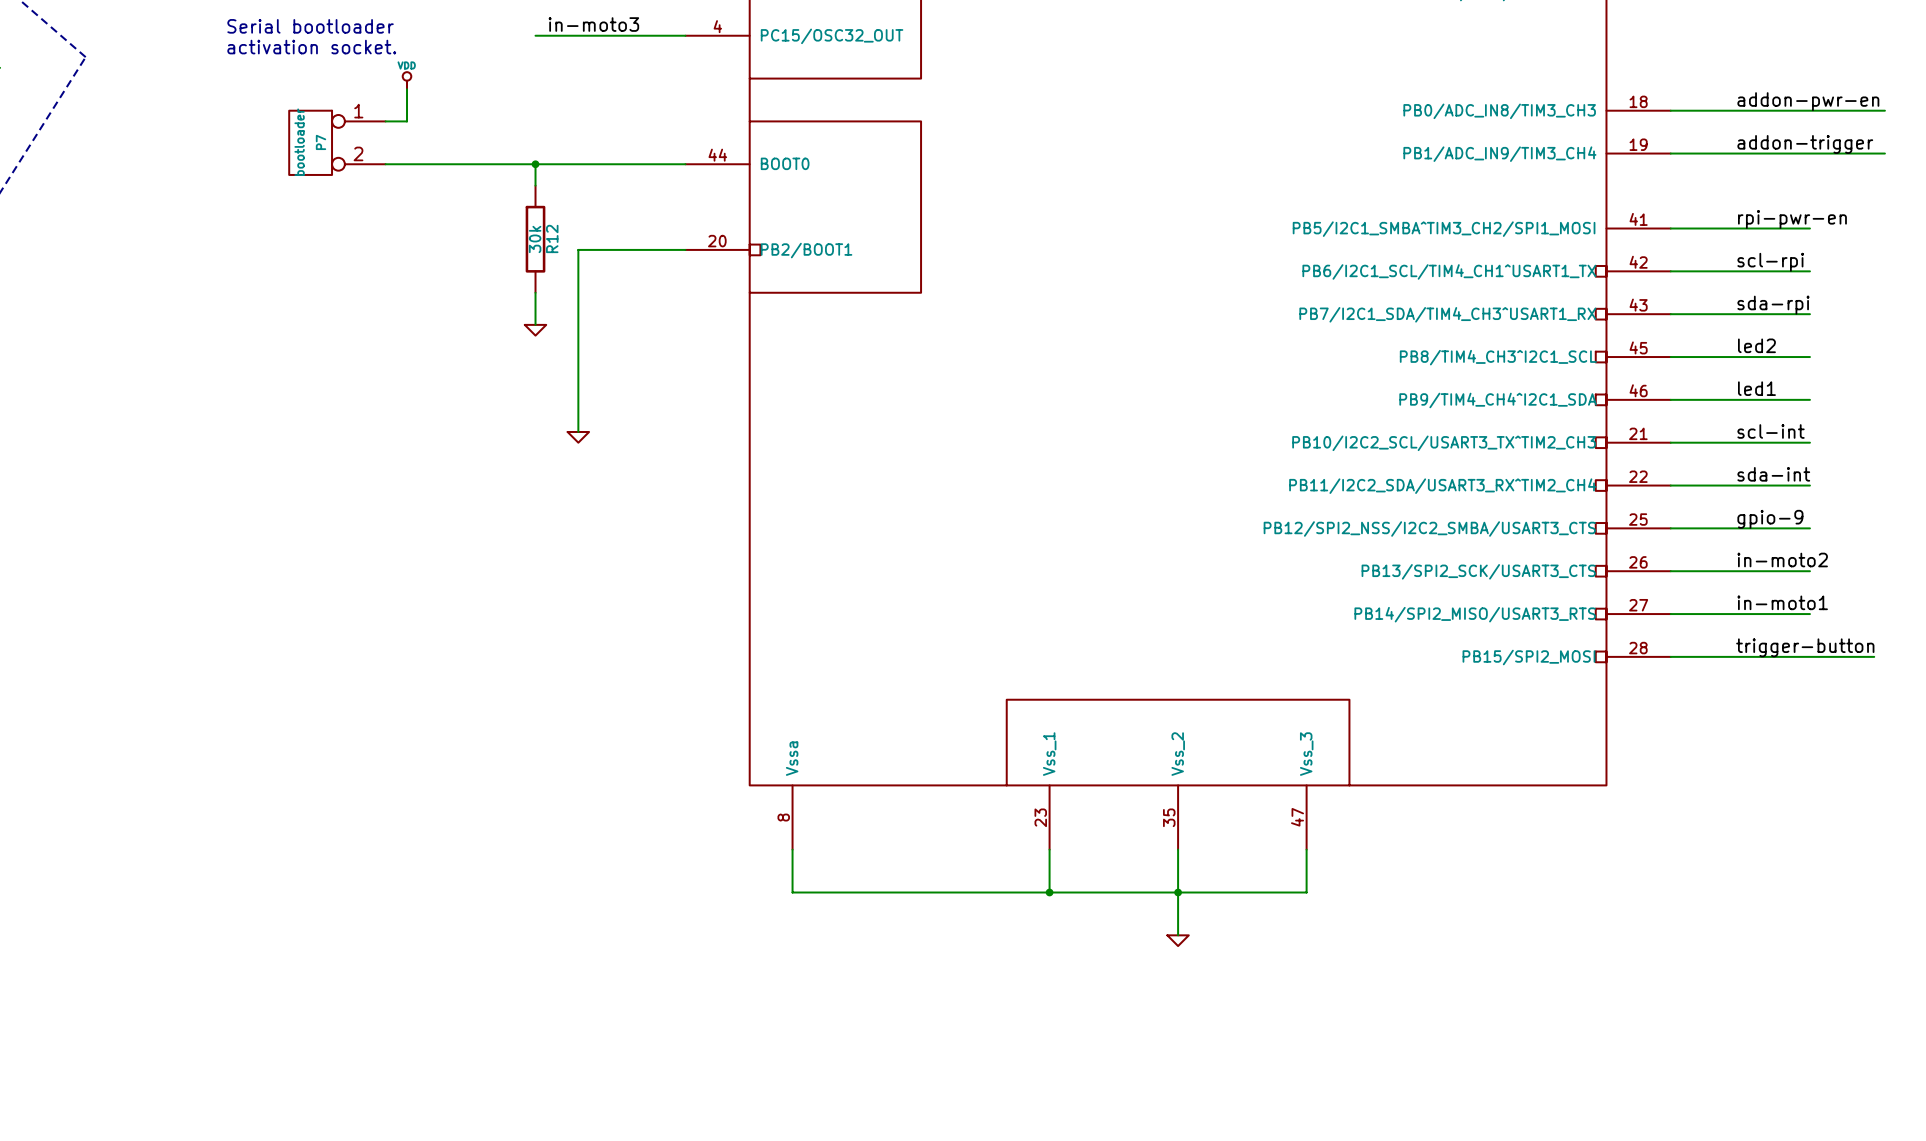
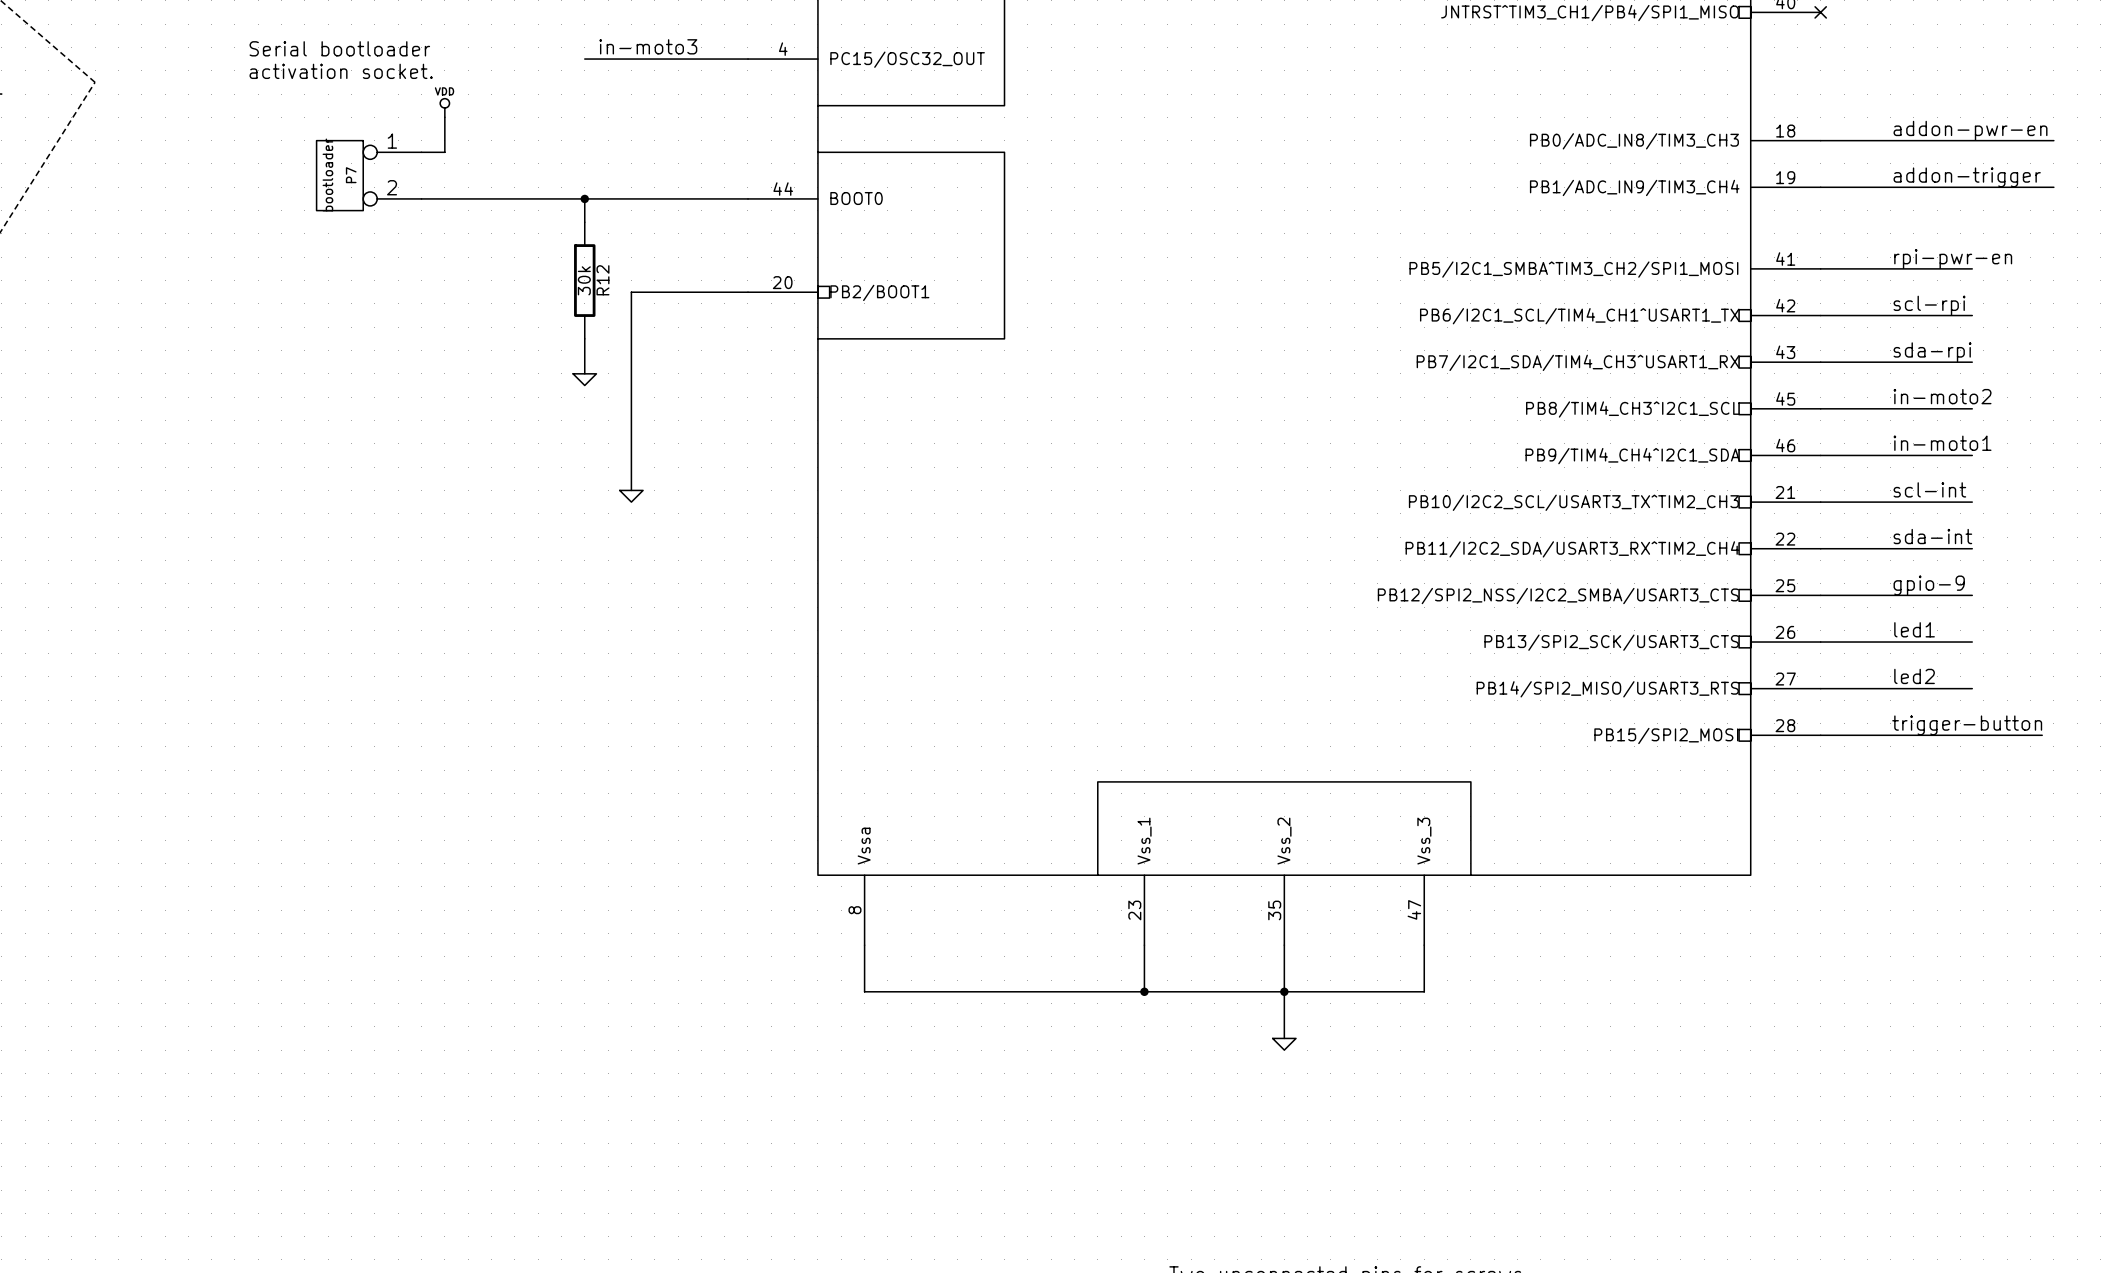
label: led2 (1756, 345) -> in-moto2 (1942, 396)
label: led1 (1756, 388) -> in-moto1 (1942, 443)
label: in-moto2 (1782, 560) -> led1 (1914, 629)
label: in-moto1 (1782, 602) -> led2 (1914, 676)

